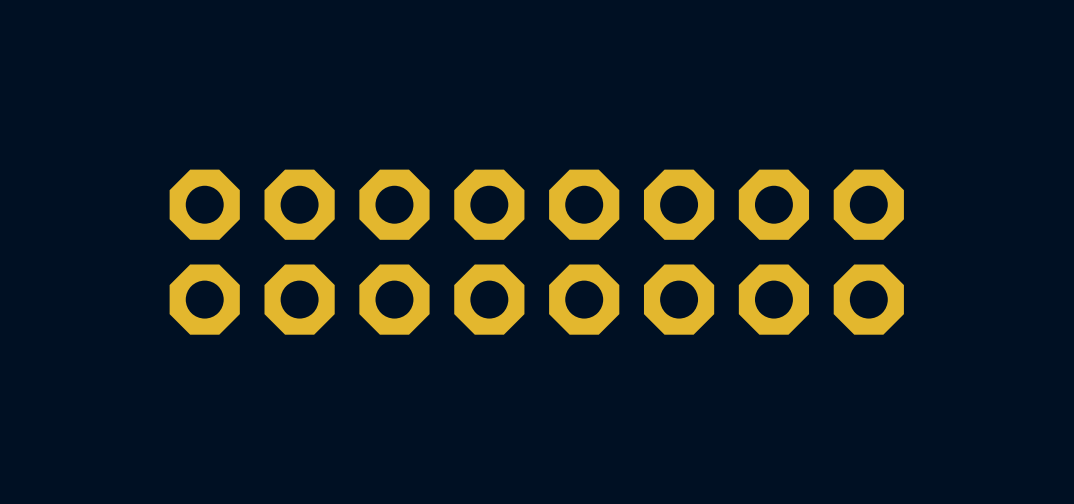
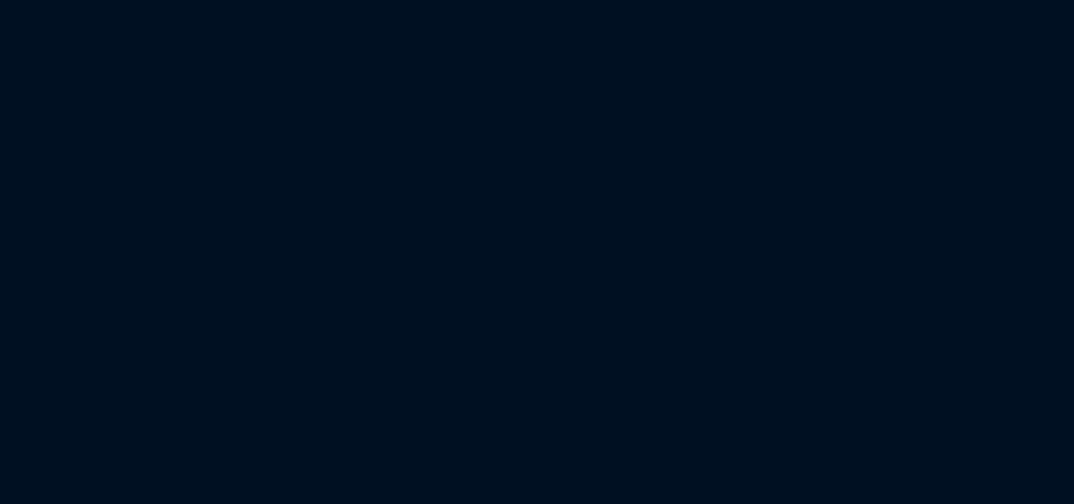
part: (536, 252) -> none

